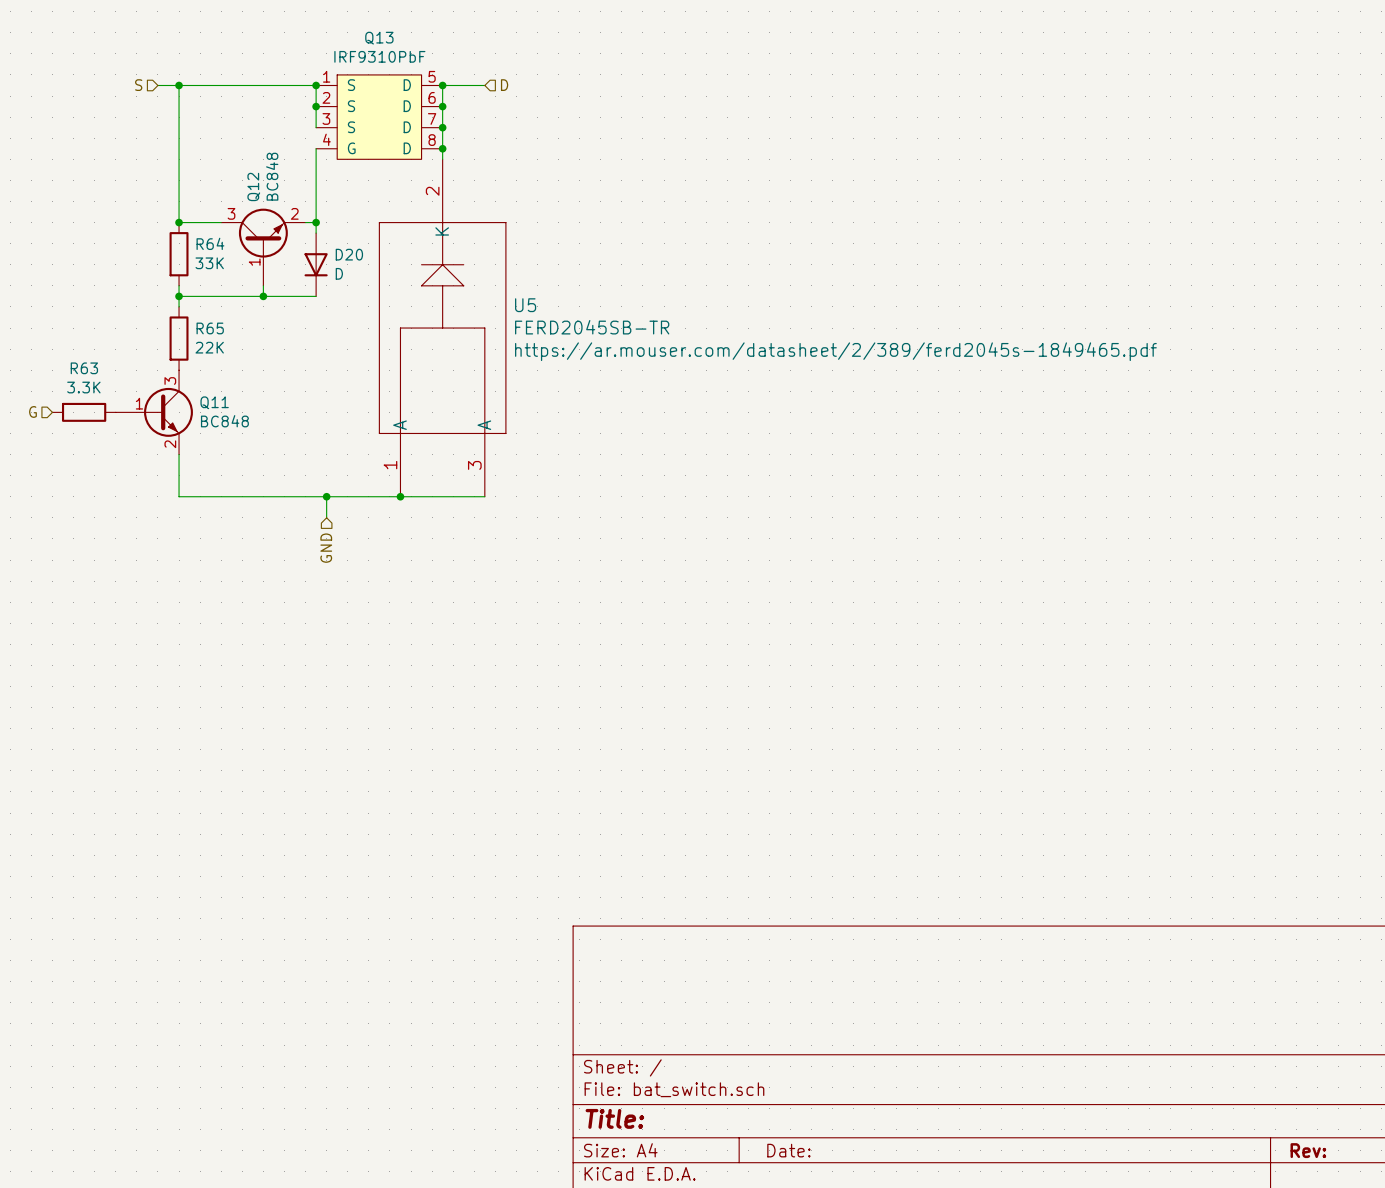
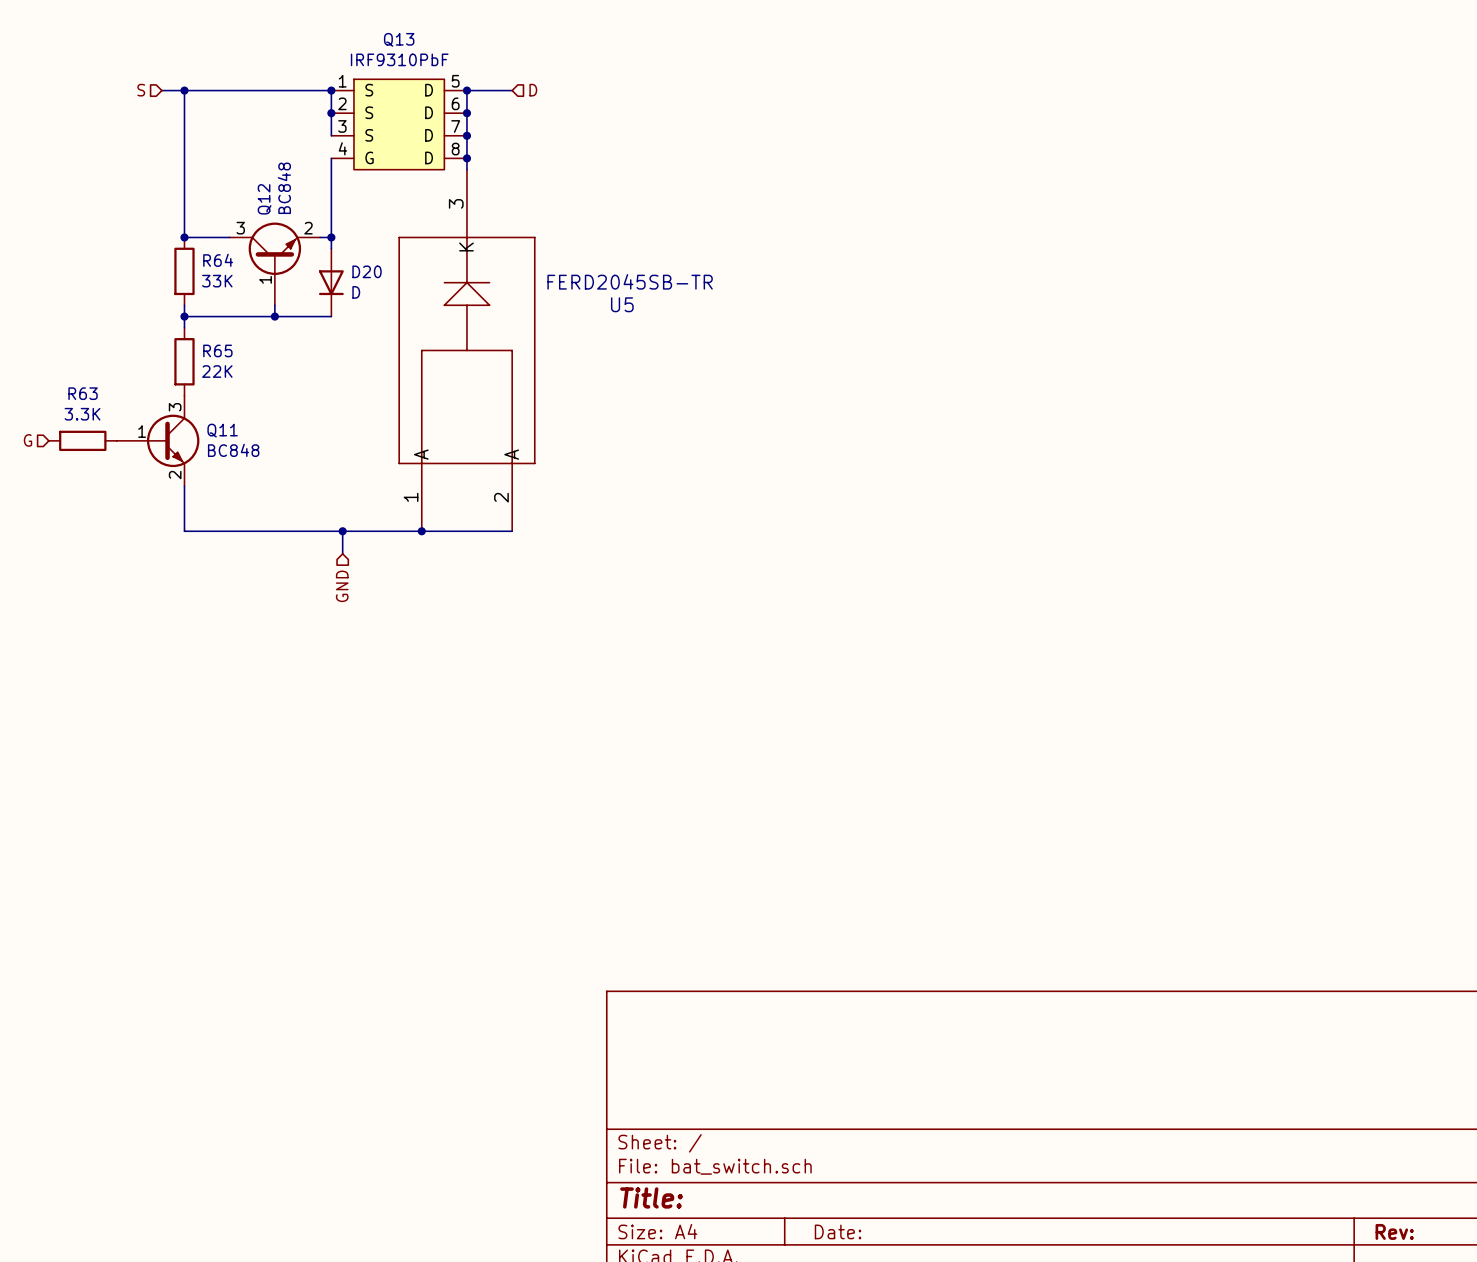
U5 pin number: 2 (432, 191) -> 3 (456, 203)
U5 name position: U5 (525, 305) -> U5 (622, 304)
U5 value position: FERD2045SB-TR (592, 327) -> FERD2045SB-TR (630, 281)
U5 text: https://ar.mouser.com/datasheet/2/389/ferd2045s-1849465.pdf (835, 351) -> none
U5 pin number: 3 (474, 465) -> 2 (501, 497)

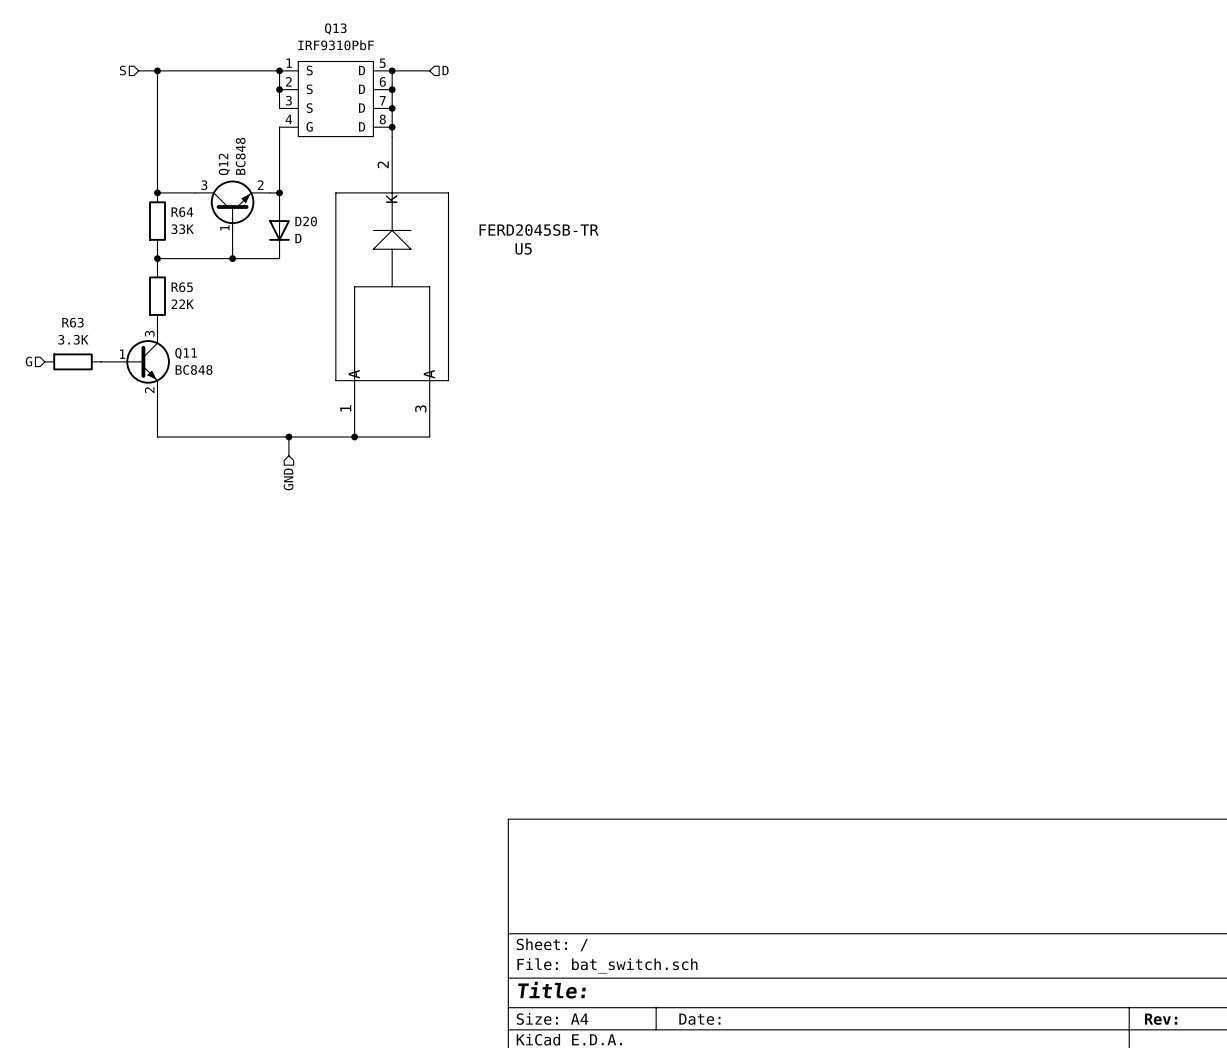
U5 pin number: 3 (456, 203) -> 2 (383, 164)
U5 pin number: 2 (501, 497) -> 3 (420, 408)

